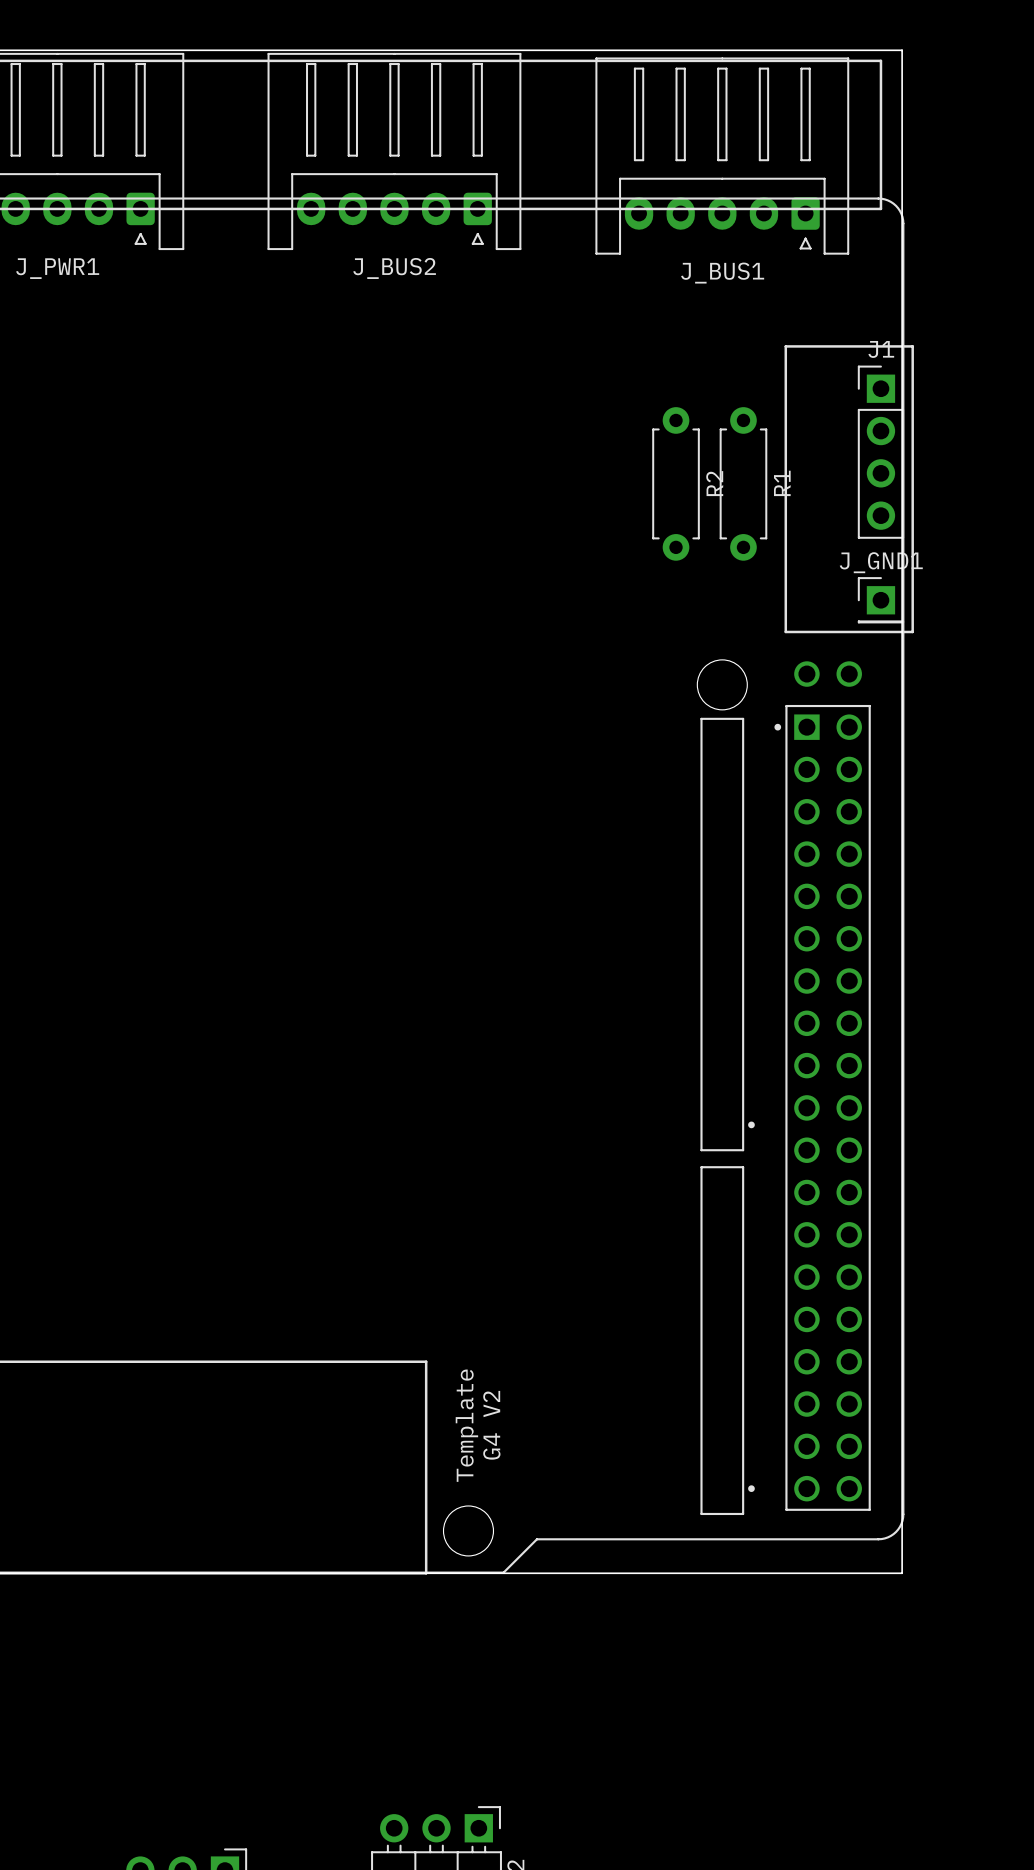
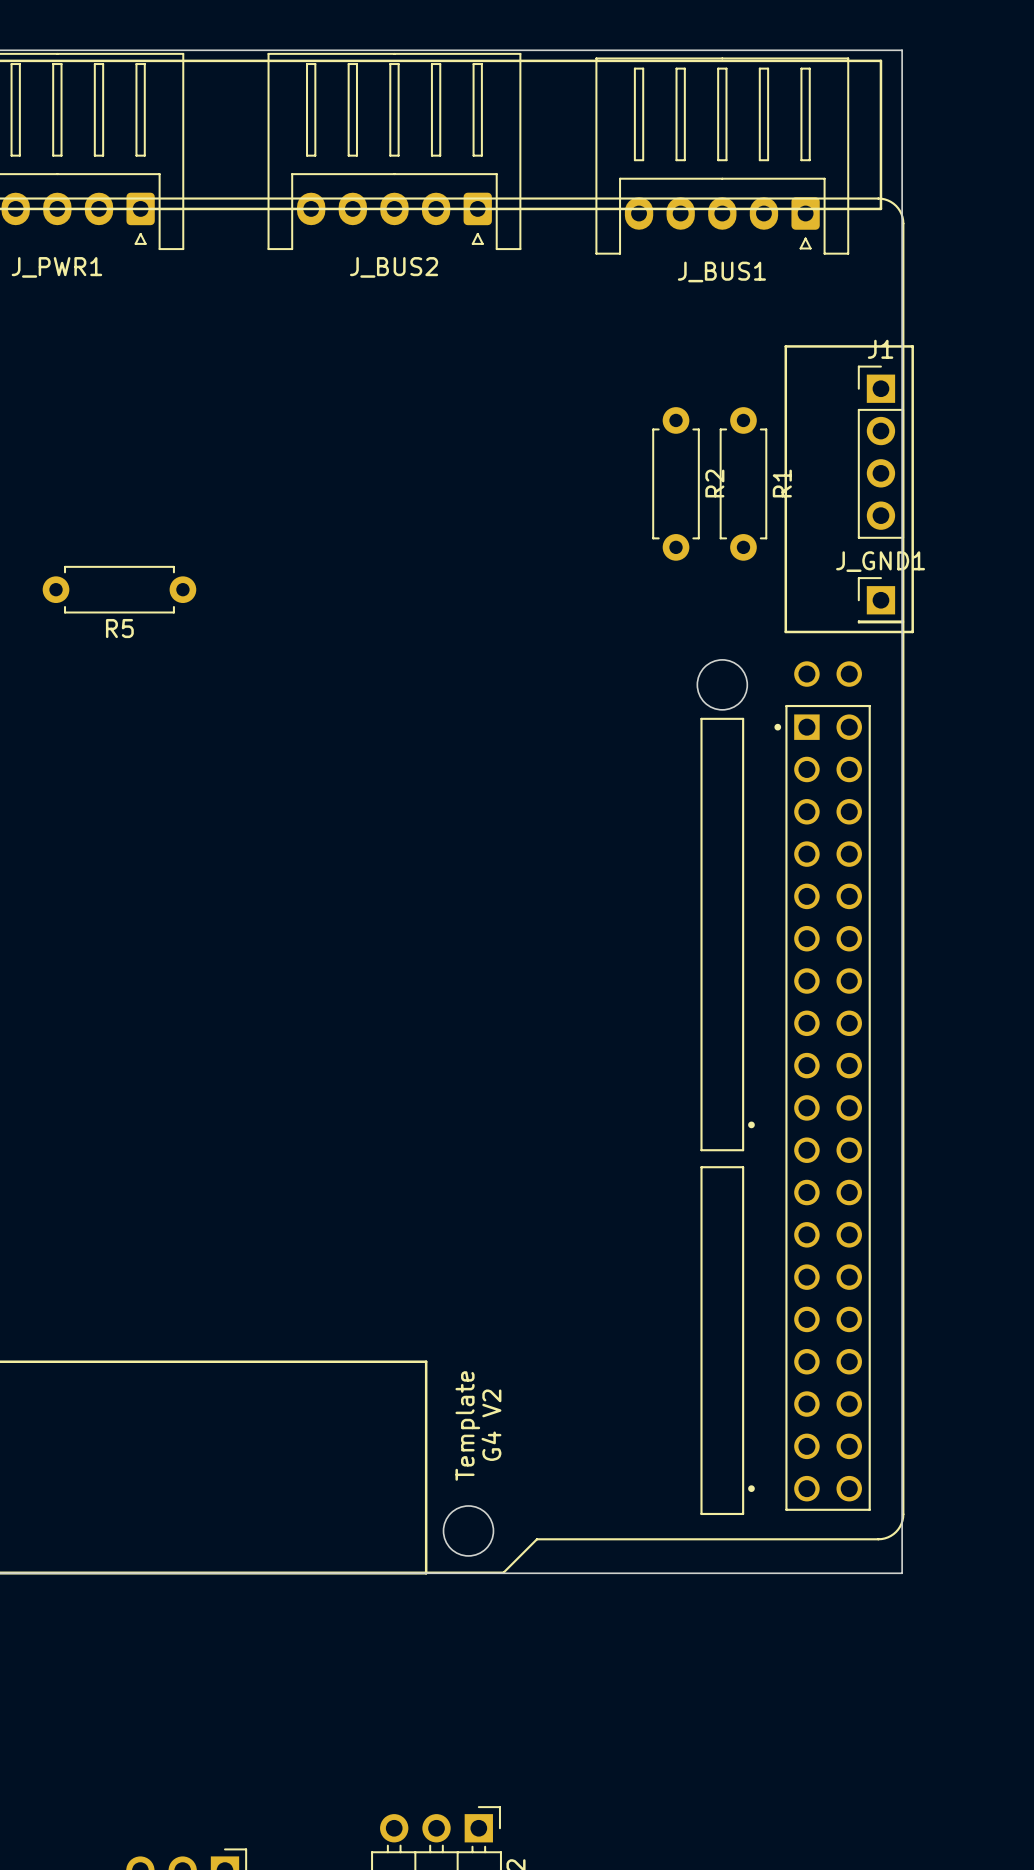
R5: none -> (119, 589)

